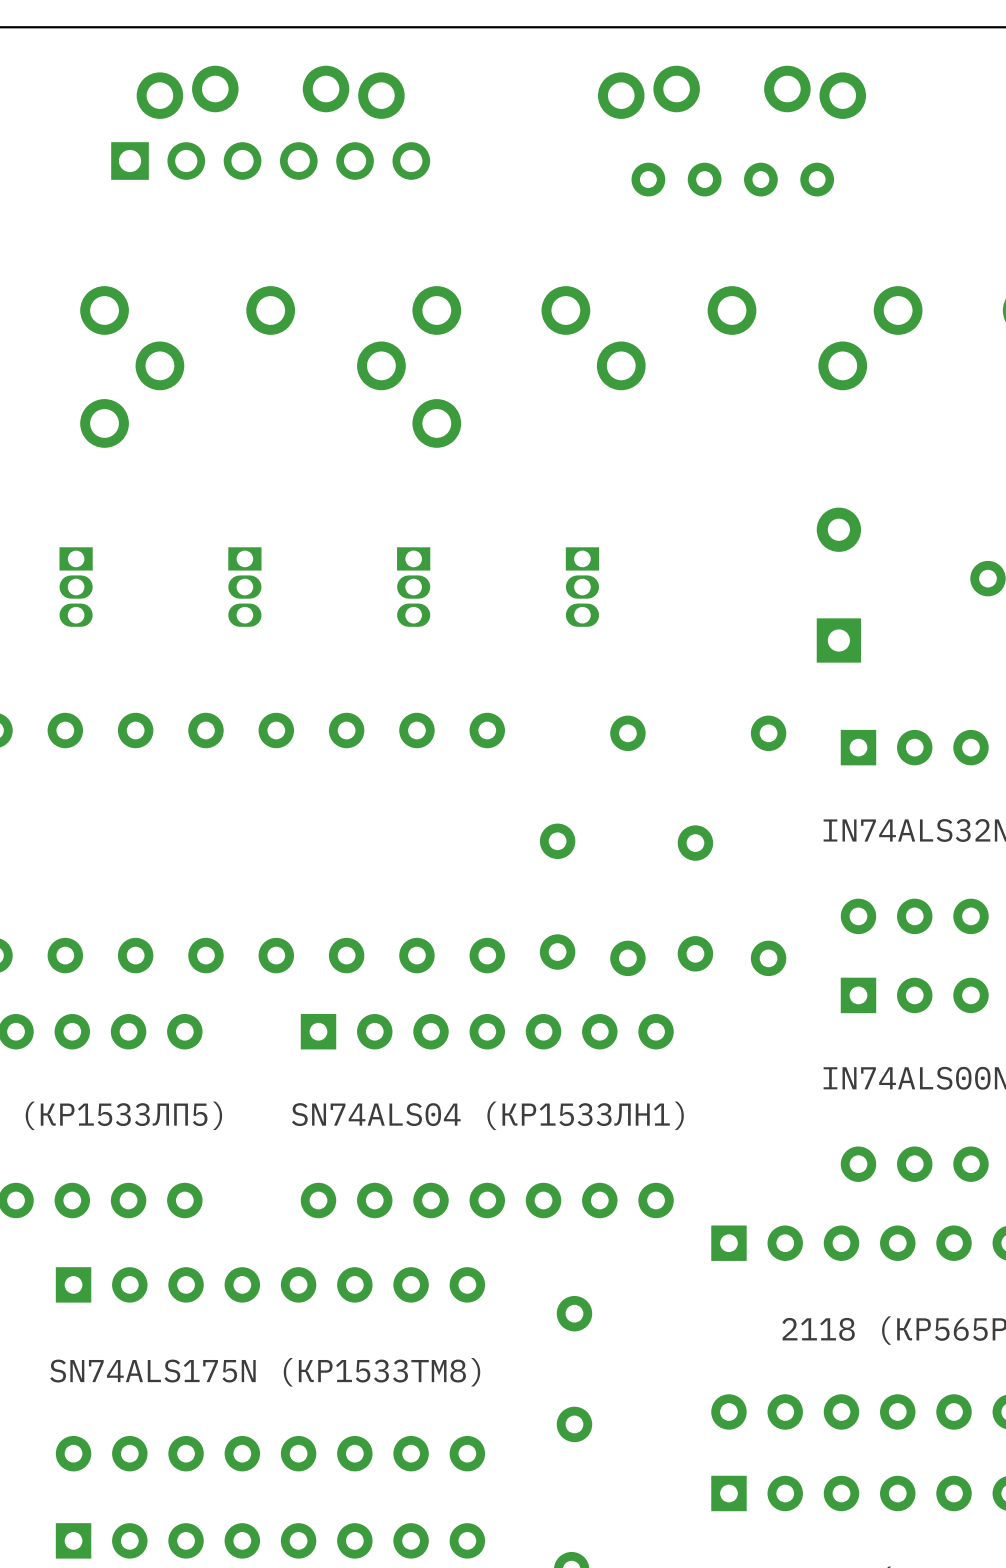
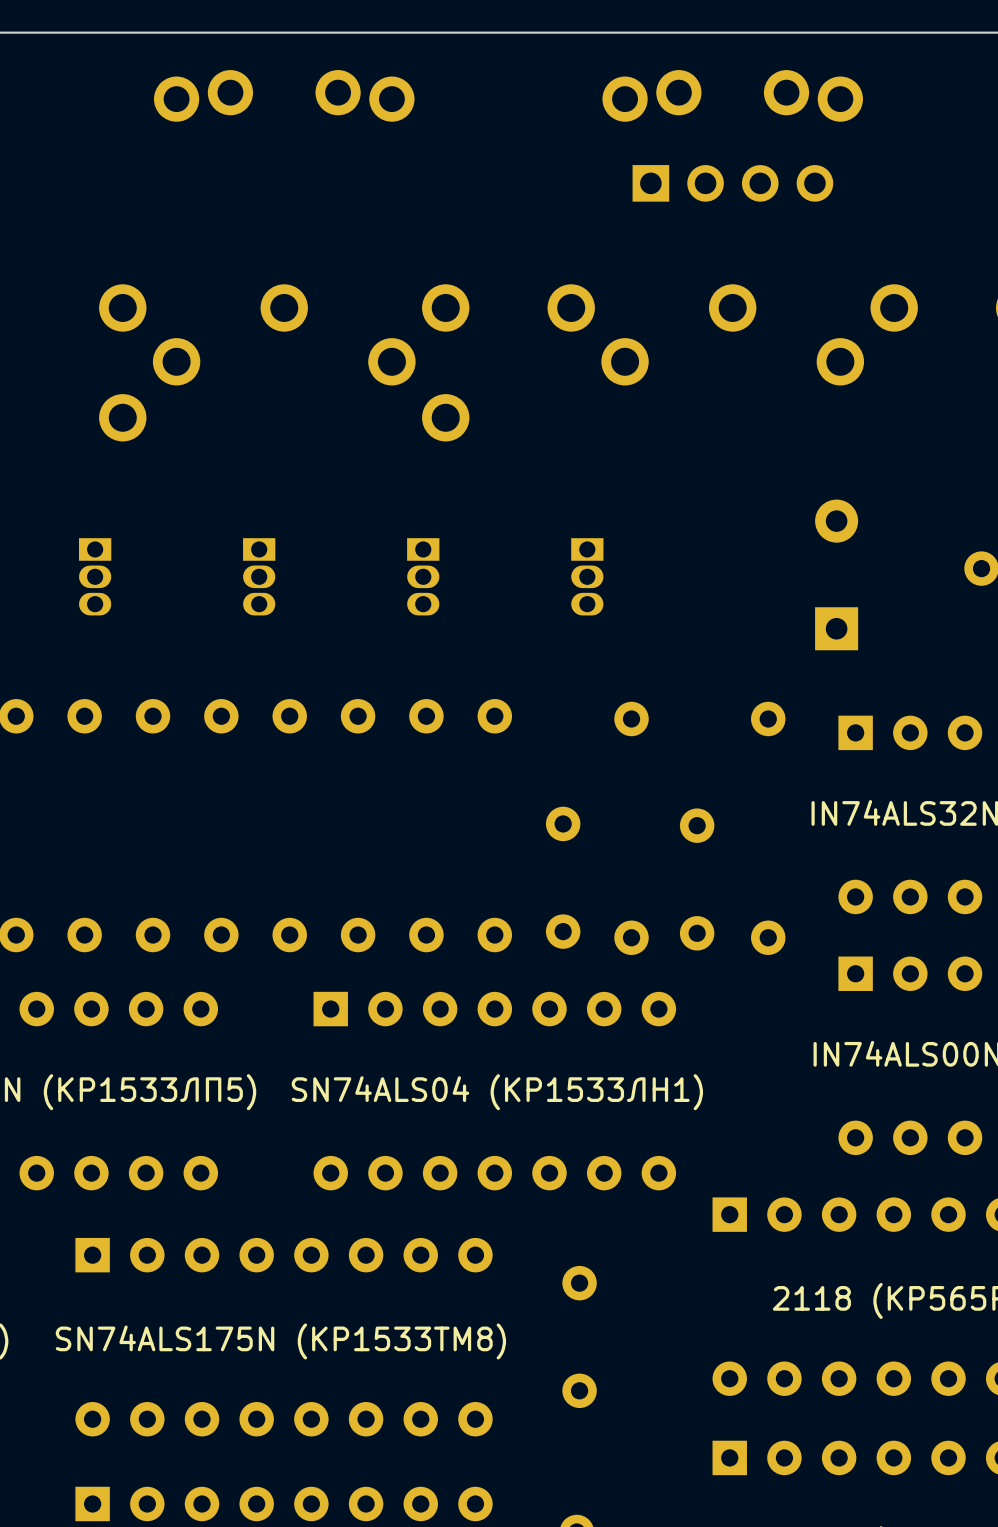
part: (270, 161) -> none
part footprint: [631, 162, 835, 197] -> [632, 165, 834, 202]

